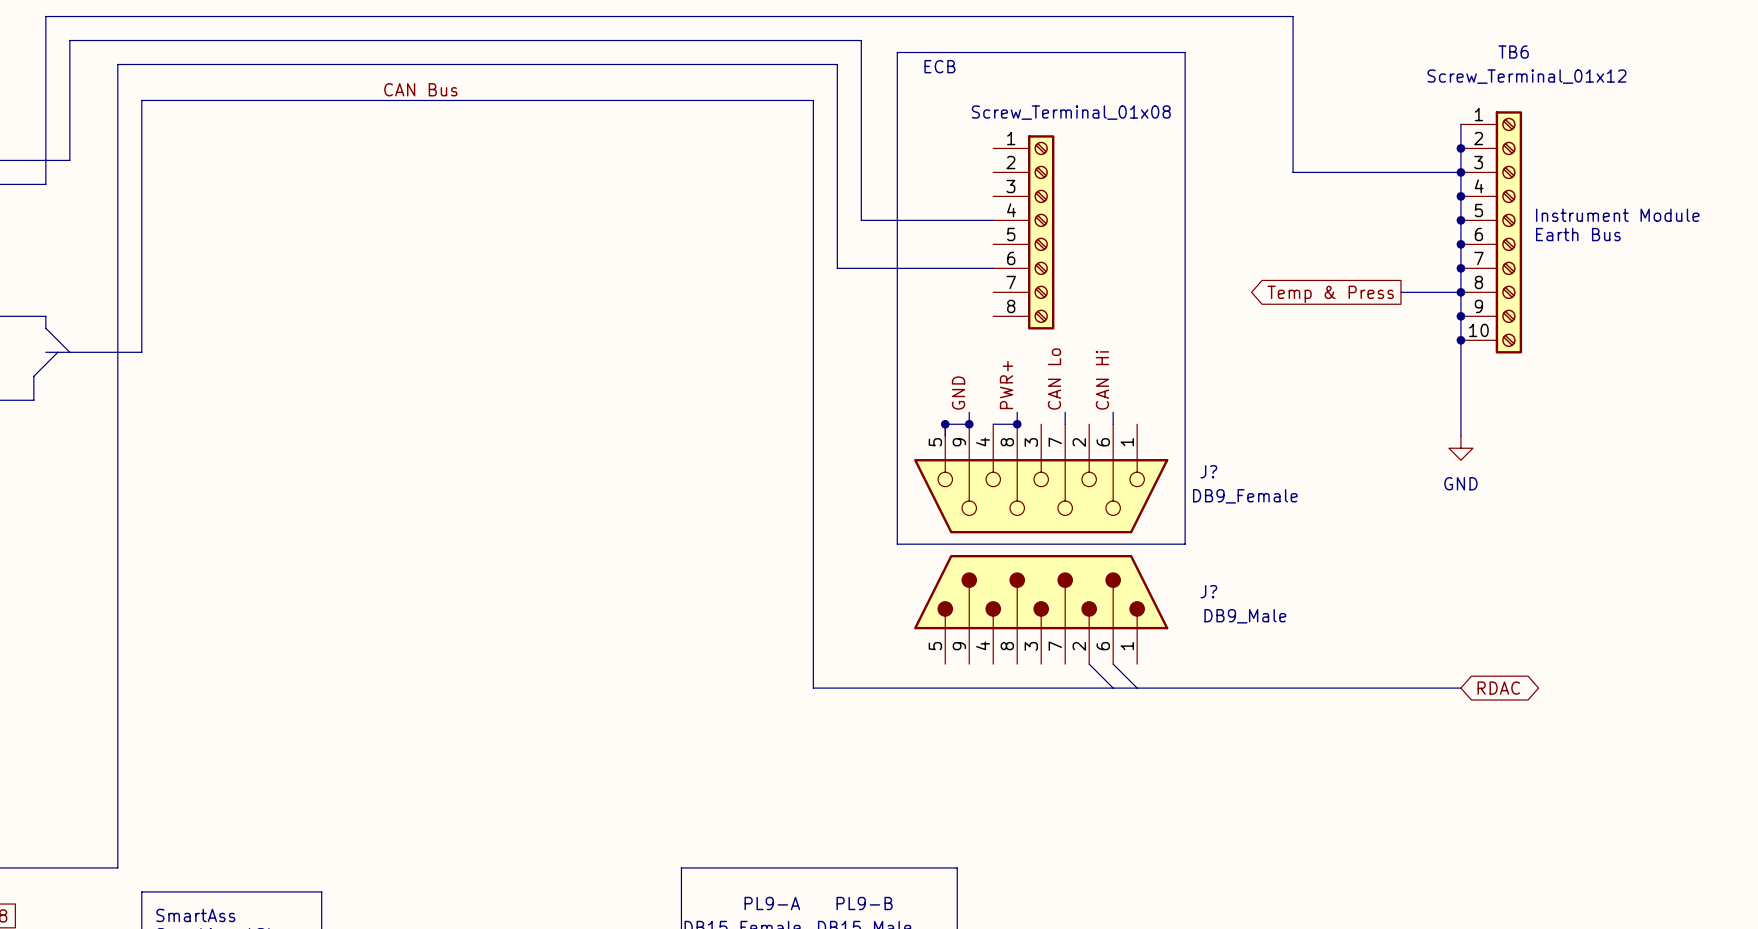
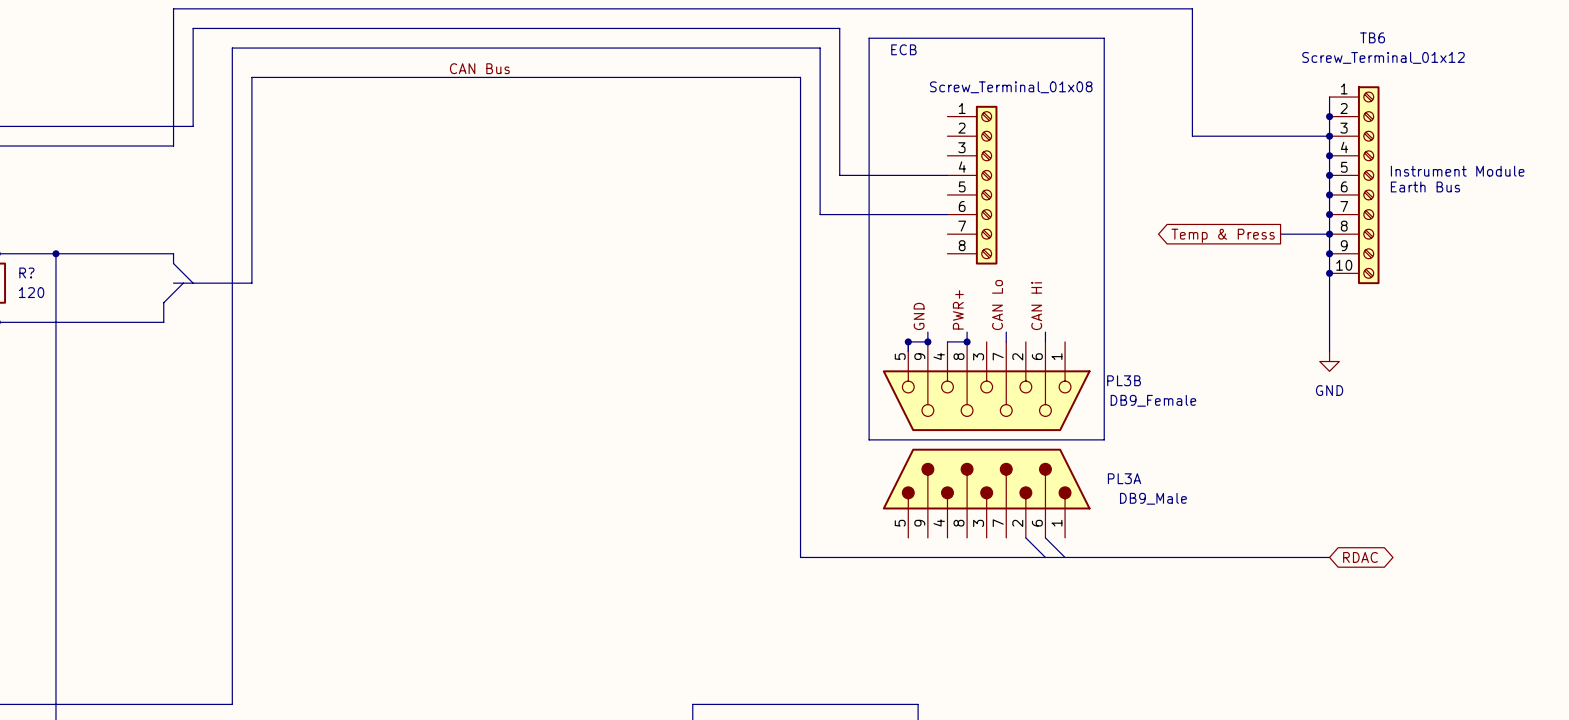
J? name: J? (1208, 471) -> PL3B (1124, 380)
J? name: J? (1208, 591) -> PL3A (1124, 478)

